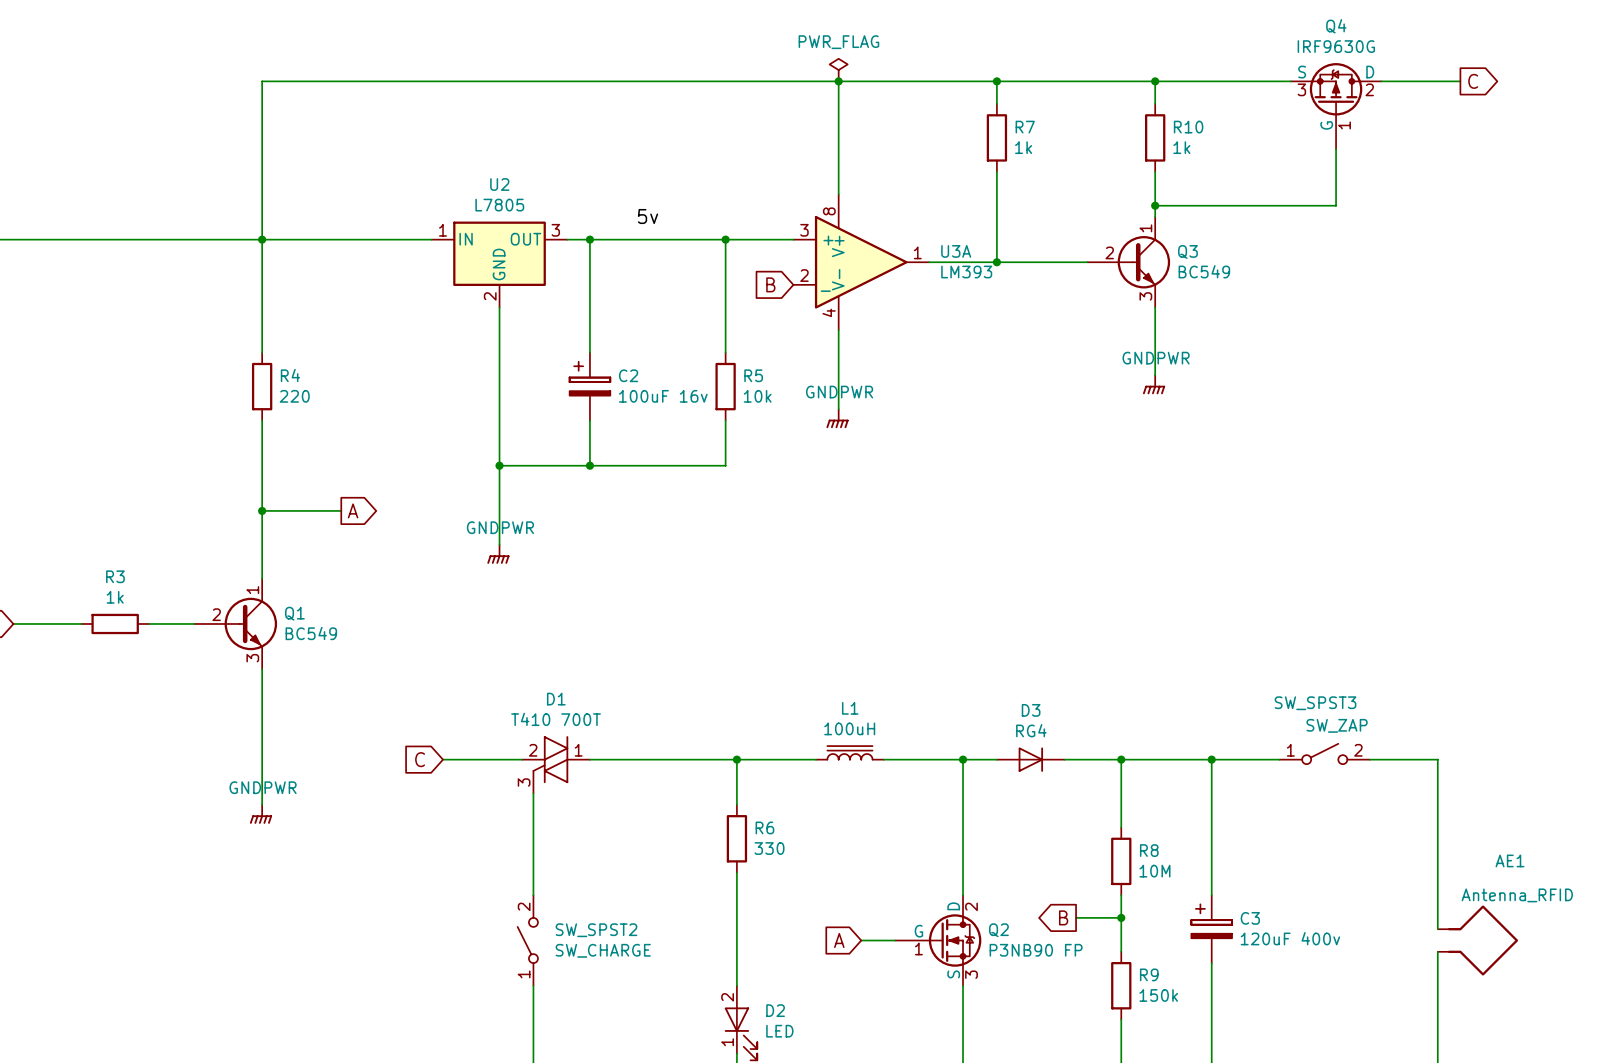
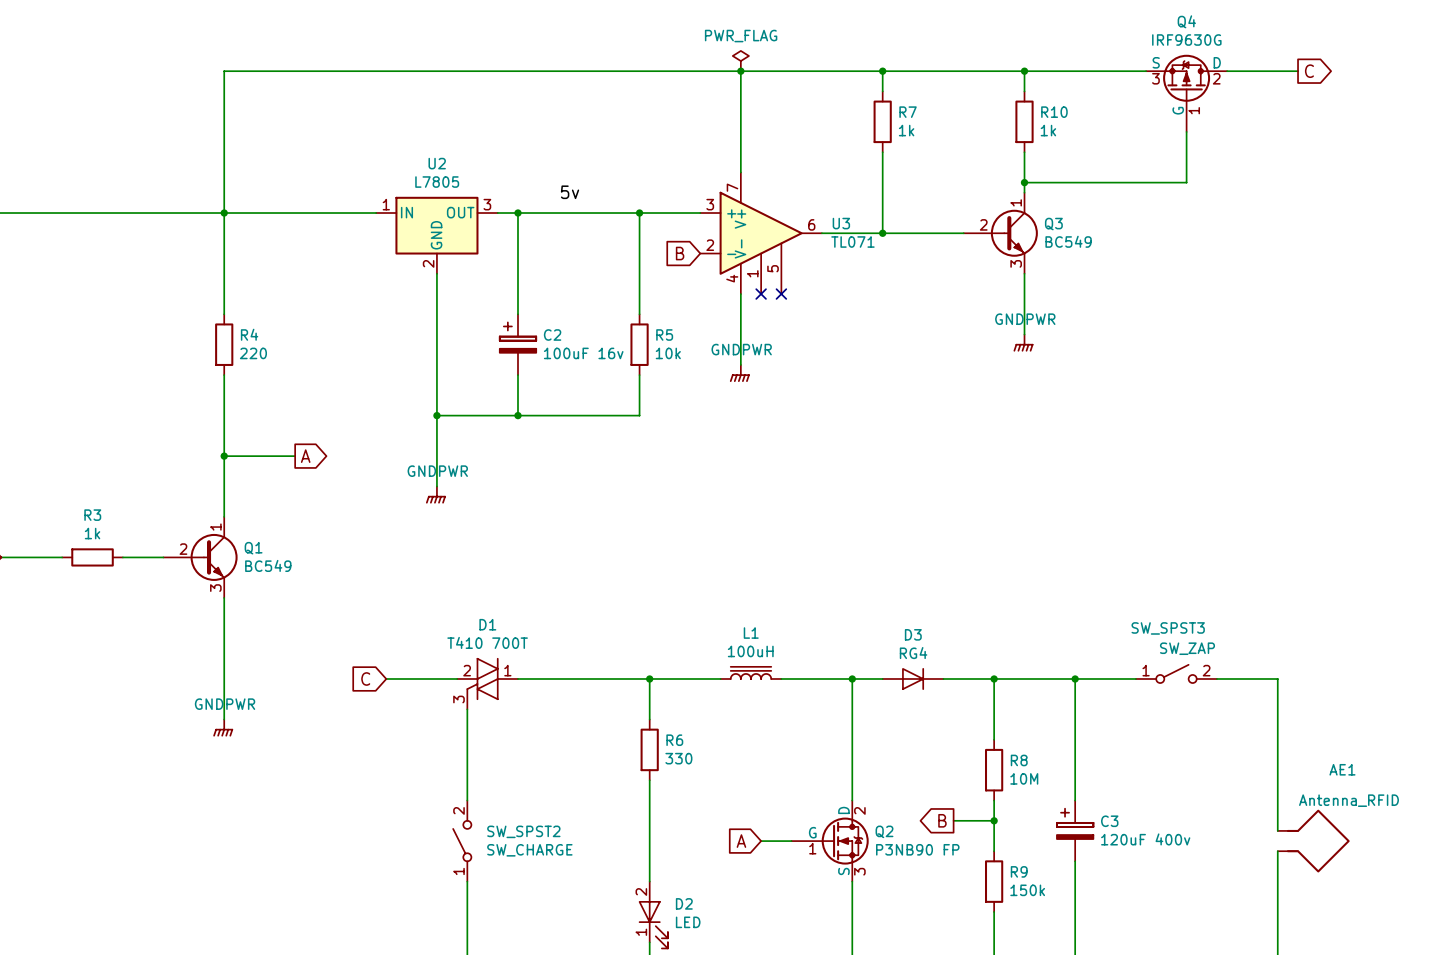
U3A: LM393 (861, 262) -> none
U3: none -> TL071 (761, 233)
no-connect mark: none -> (761, 294)
no-connect mark: none -> (781, 294)

